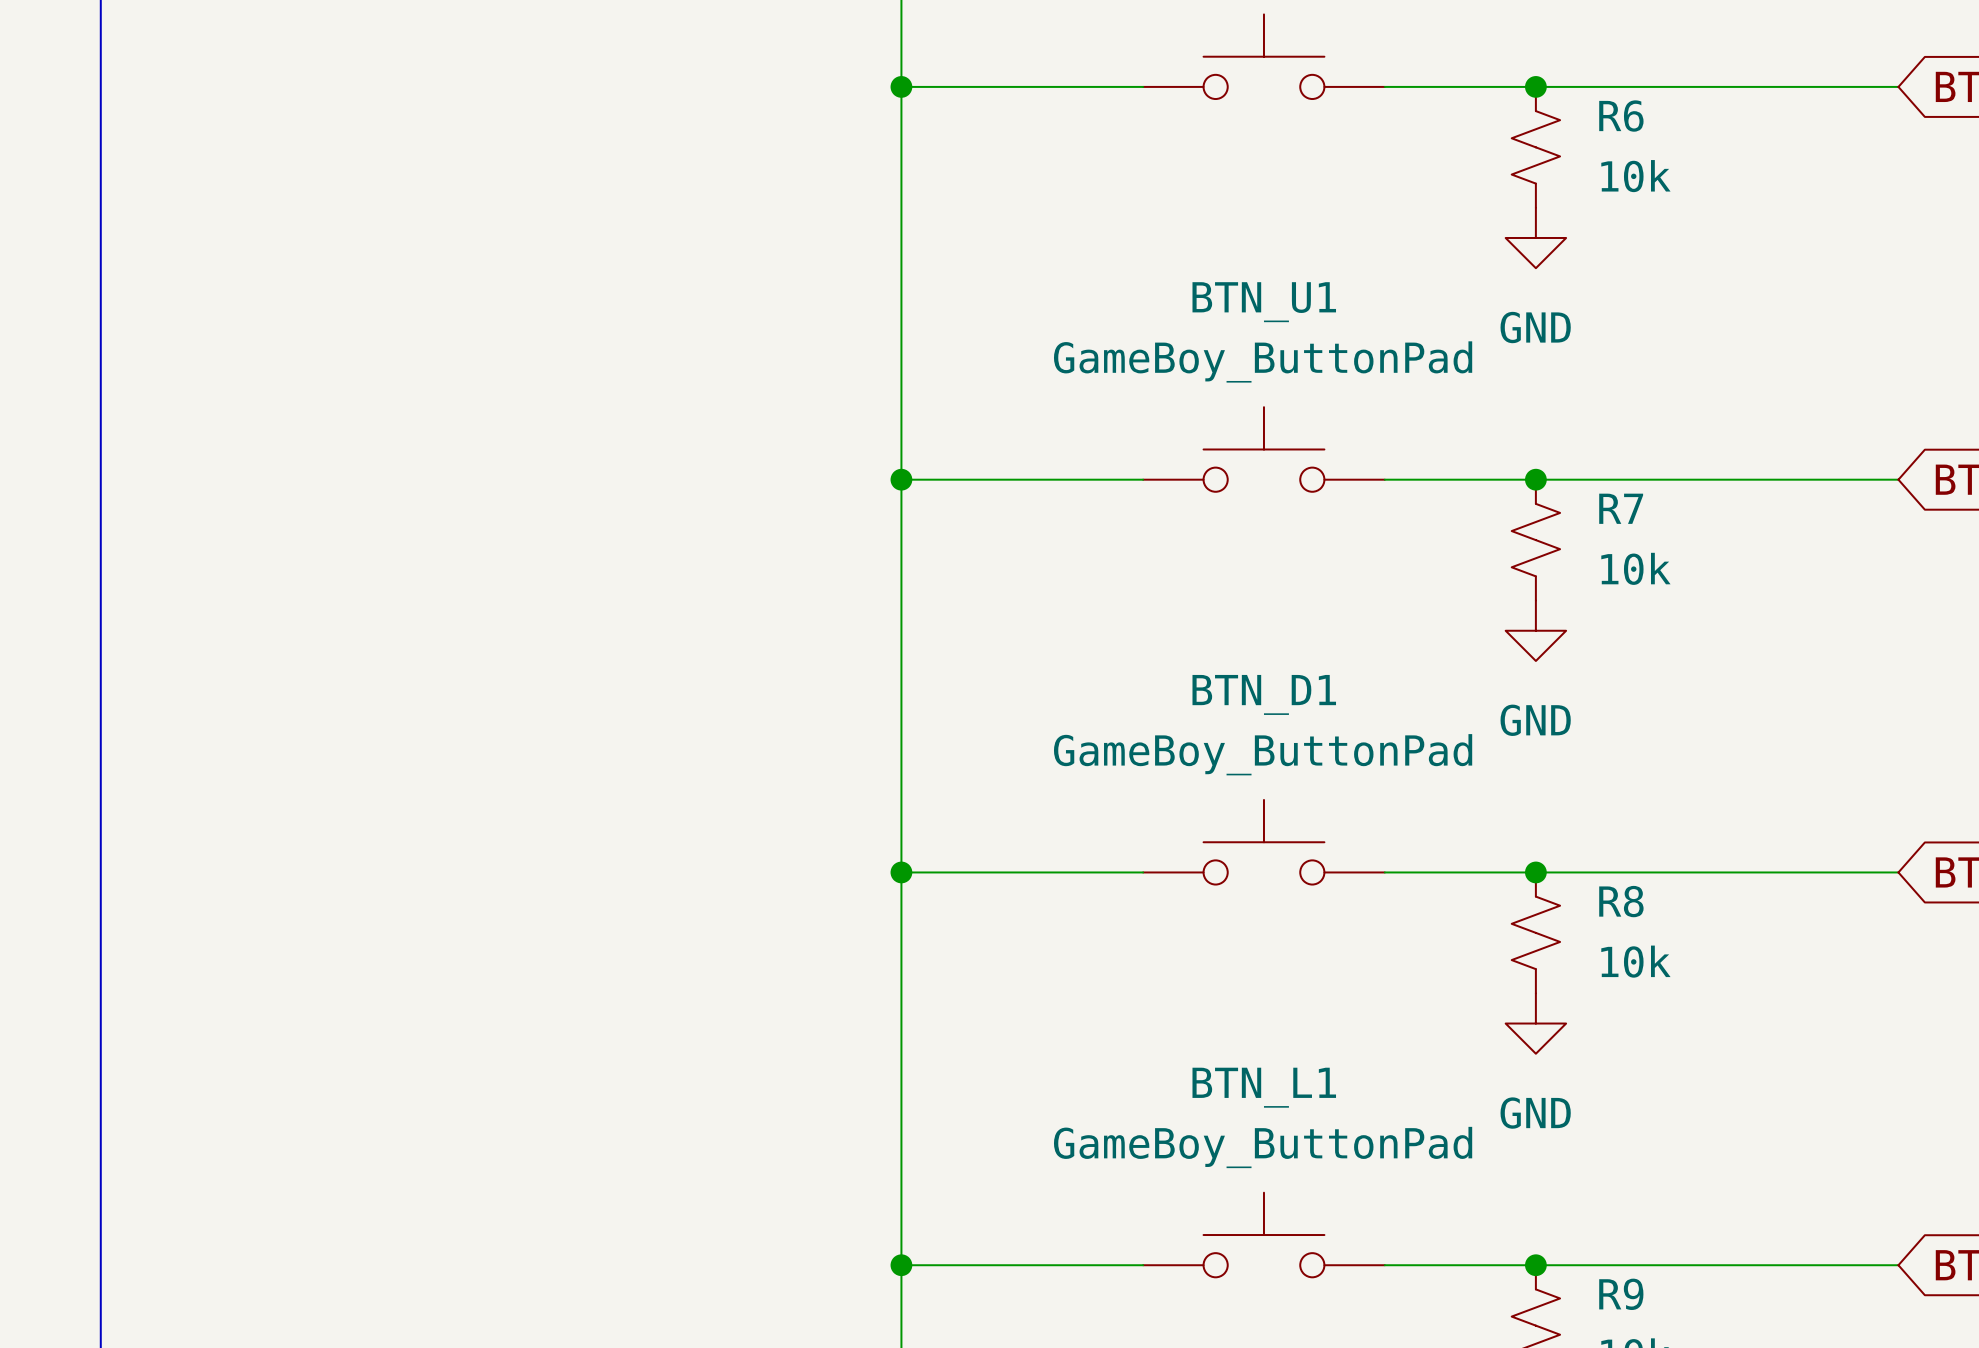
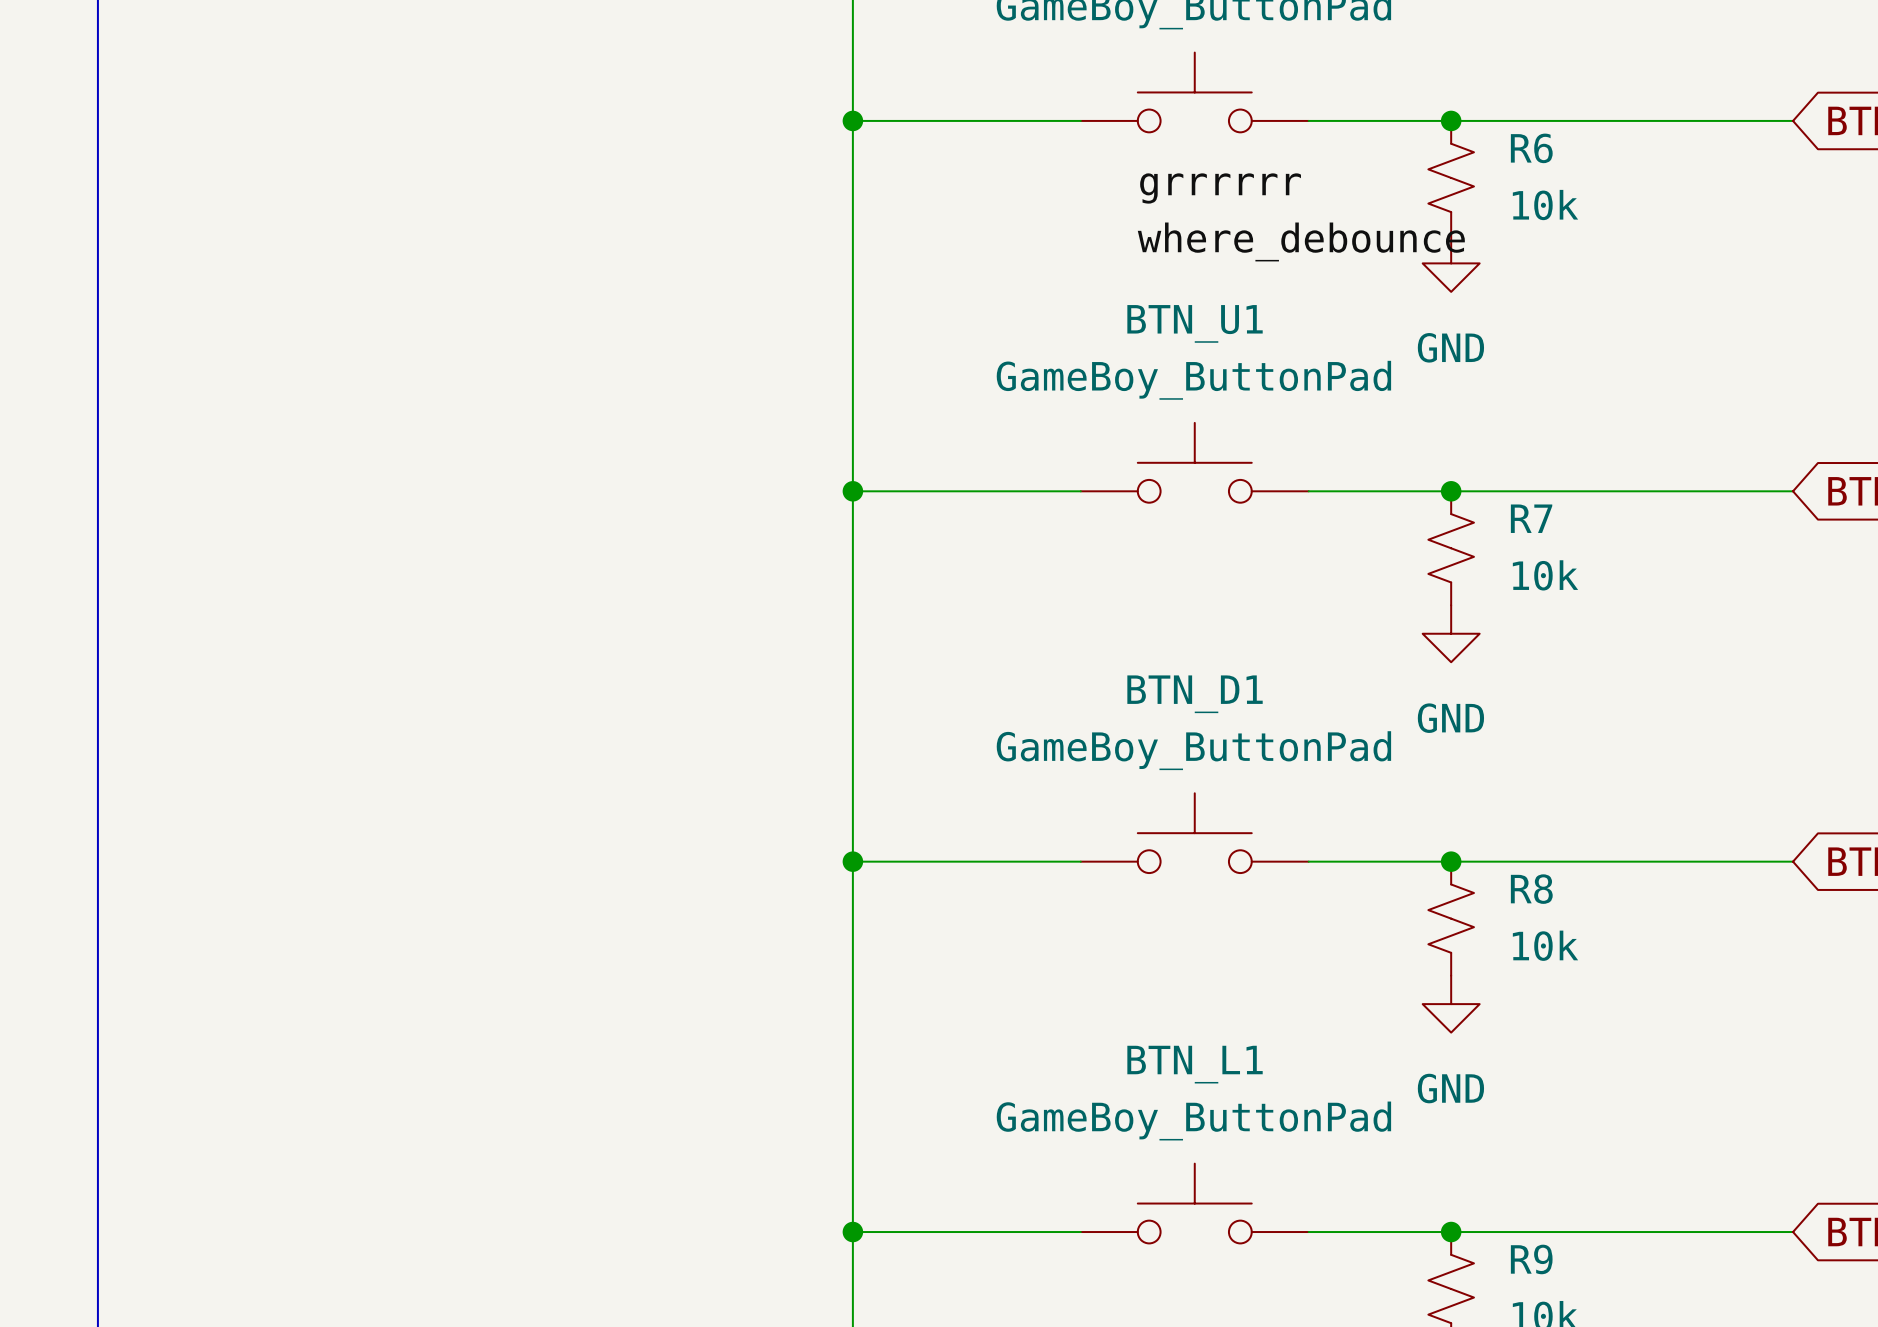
label: none -> grrrrrr (1220, 188)
label: none -> where_debounce (1301, 241)

